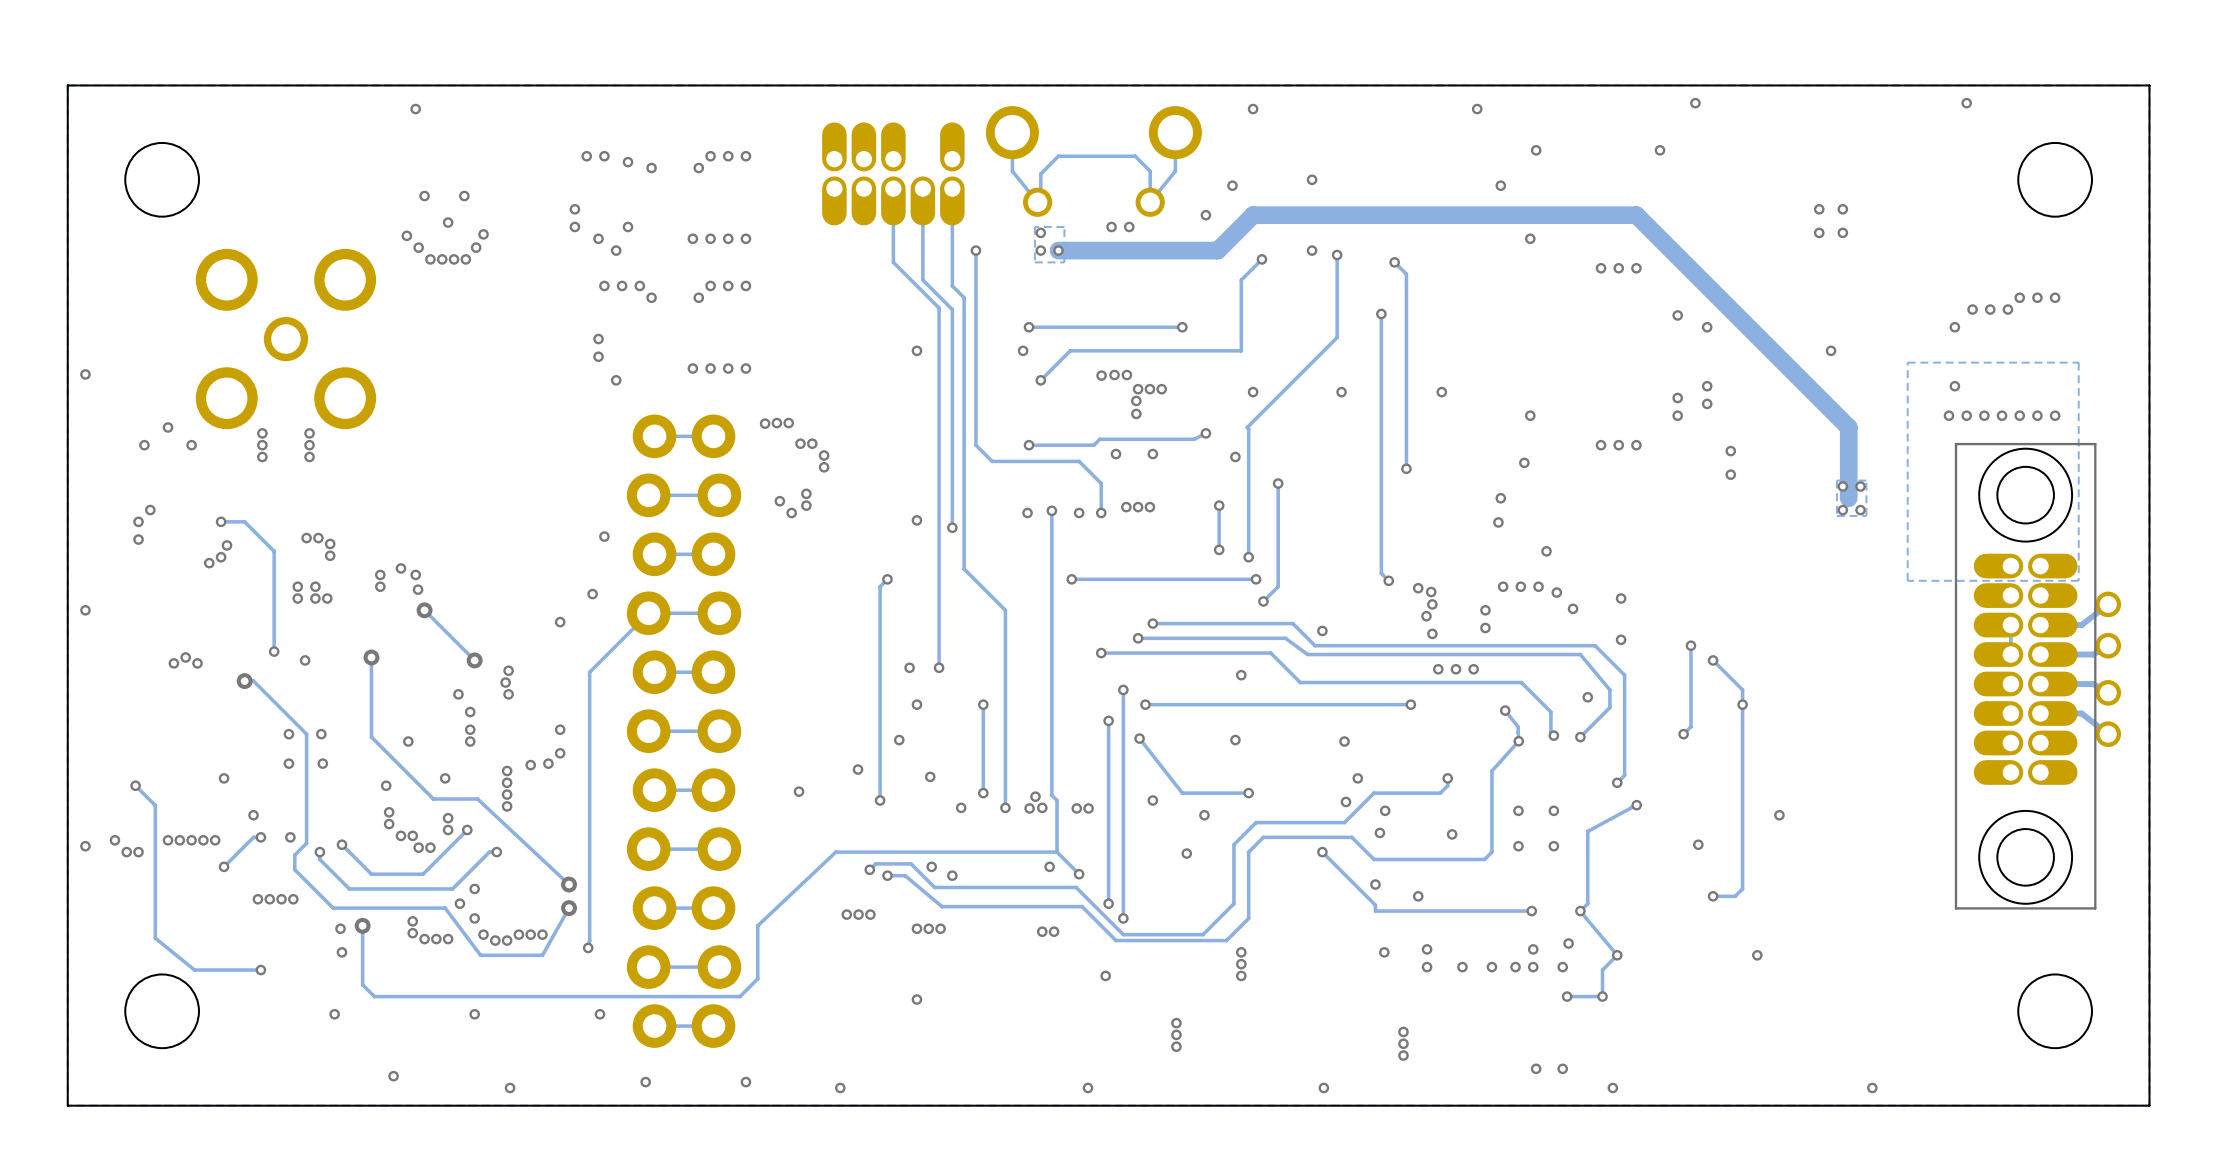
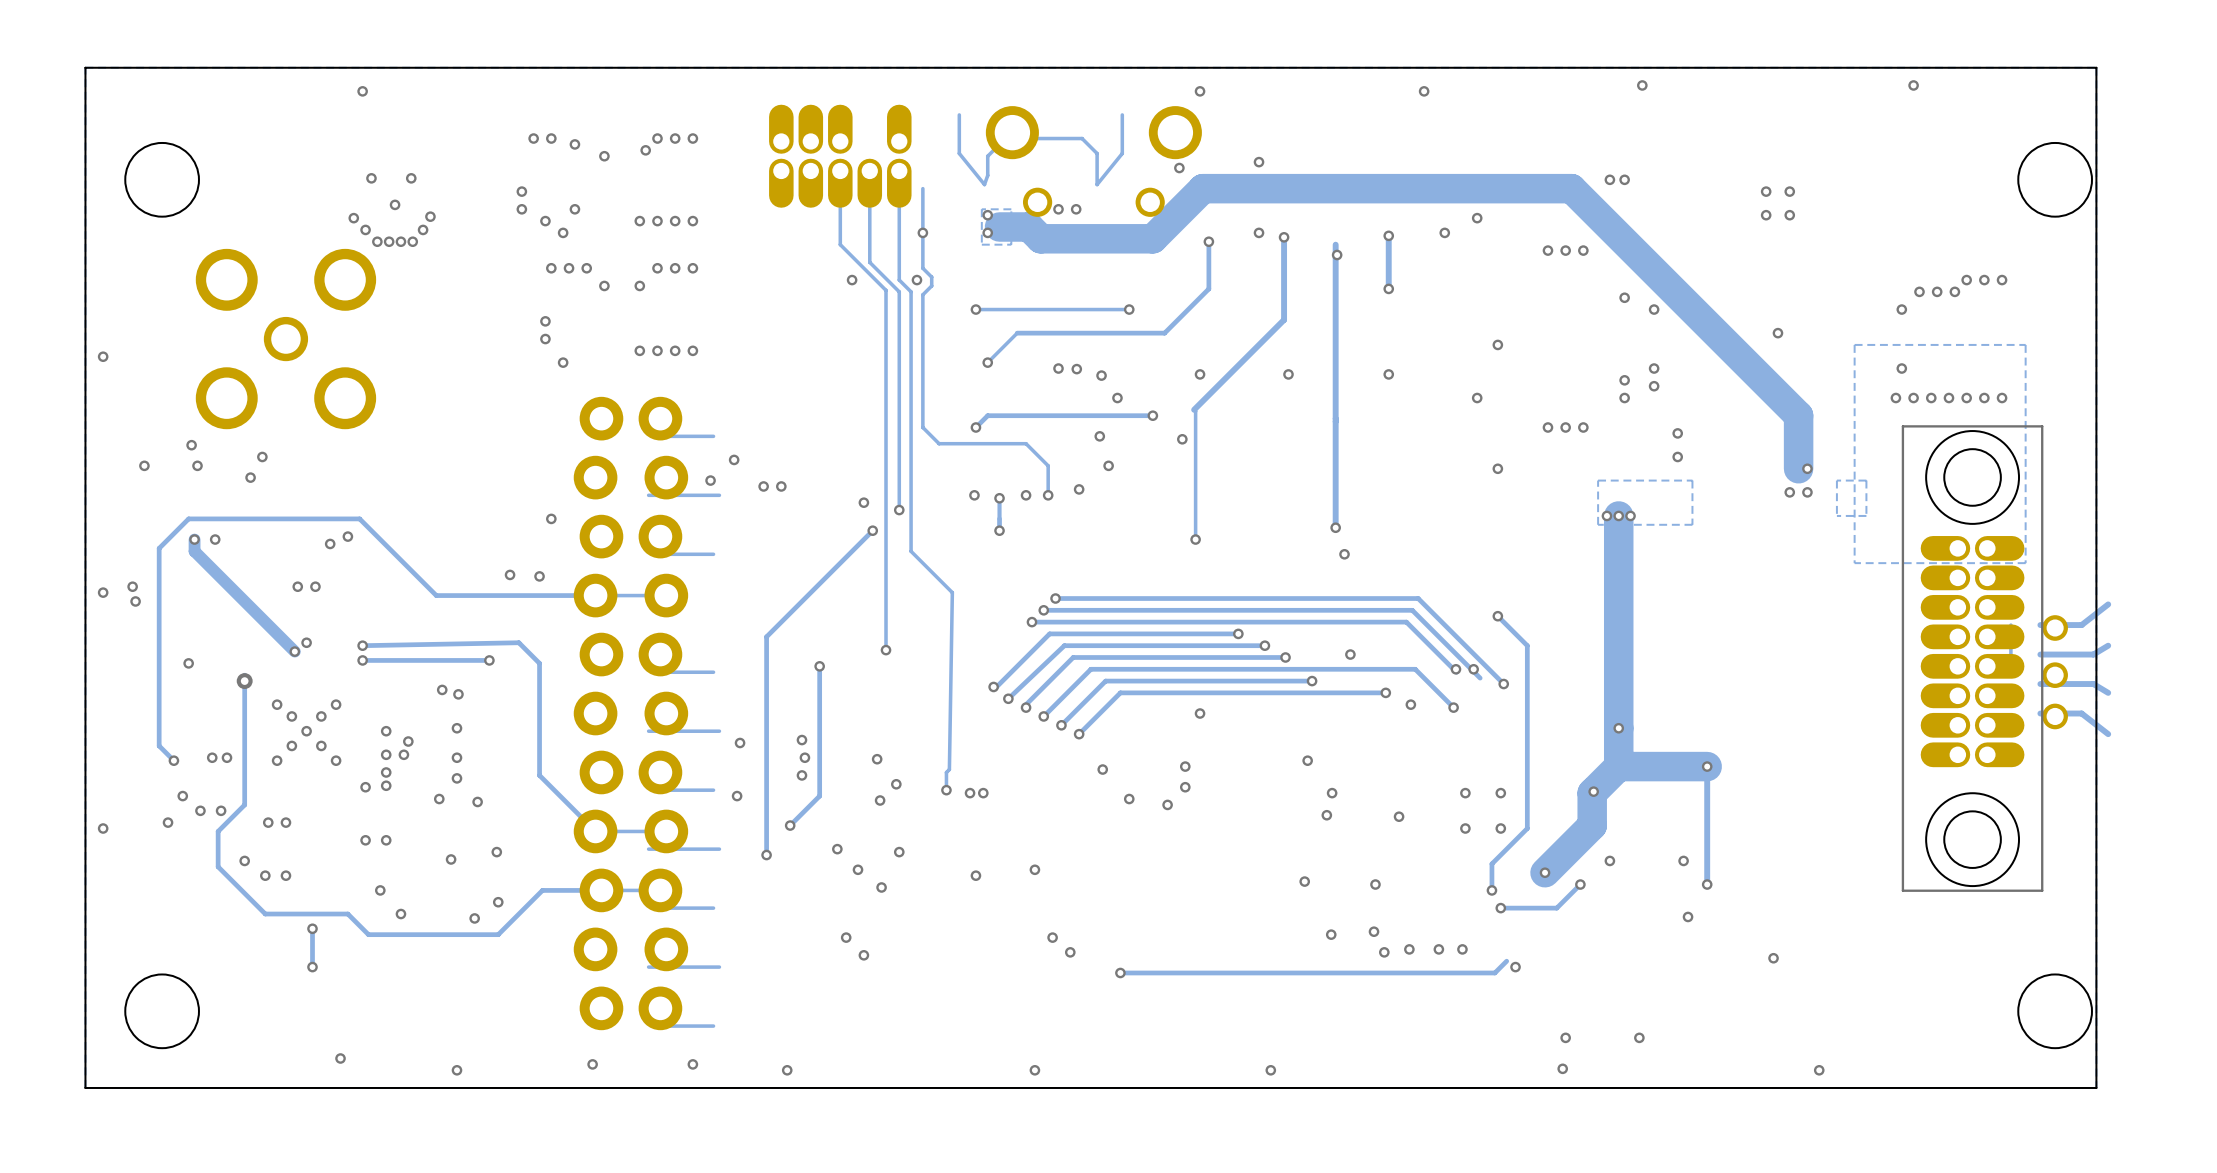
via: none -> (1642, 85)
board edge: (2149, 85) (67, 85) (67, 1105) (2149, 1105) (2149, 85) -> (2096, 67) (2096, 1087) (85, 1087) (85, 67) (2096, 67)
via: none -> (362, 91)
via: none -> (1200, 91)
via: none -> (1424, 91)
via: (1695, 103) -> none
via position: (1966, 103) -> (1913, 85)
via: (415, 109) -> none
via: (1253, 109) -> none
via: (1477, 109) -> none
track: (1175, 132) (1175, 171) (1150, 202) (1150, 171) (1135, 156) (1058, 156) (1040, 173) (1040, 193) (1037, 202) (1012, 171) (1012, 132) -> (1122, 114) (1122, 153) (1097, 184) (1097, 153) (1082, 138) (1005, 138) (987, 156) (987, 175) (984, 184) (959, 153) (959, 114)
via: none -> (533, 138)
via: none -> (551, 138)
via: none -> (657, 138)
via: none -> (675, 138)
via: none -> (692, 138)
via: none -> (645, 150)
via: (1536, 150) -> none
via: (1660, 150) -> none
via position: (586, 156) -> (574, 144)
via: (710, 156) -> none
via: (728, 156) -> none
via: (745, 156) -> none
via: (628, 162) -> none
via: none -> (1259, 162)
via: (651, 168) -> none
via: (698, 168) -> none
via: none -> (1179, 168)
track: none -> (869, 170) (869, 262) (899, 291) (899, 510)
track: none -> (899, 170) (899, 280) (911, 291) (911, 551) (952, 592) (949, 769) (946, 772) (946, 790)
part position: (893, 173) -> (840, 156)
via: none -> (371, 178)
via: none -> (411, 178)
via: (1312, 179) -> none
via: none -> (1609, 179)
via: none -> (1624, 179)
track: (893, 185) (893, 262) (939, 308) (939, 667) -> (840, 168) (840, 244) (886, 290) (886, 650)
via: (1232, 185) -> none
via: (1500, 185) -> none
track: (952, 188) (952, 285) (964, 297) (964, 569) (1005, 610) (1005, 807) -> none
via: none -> (521, 191)
via: none -> (1766, 191)
via: none -> (1789, 191)
via: (424, 196) -> none
via: (464, 196) -> none
via: none -> (395, 204)
via: none -> (521, 209)
via: none -> (1058, 209)
via: none -> (1076, 209)
via: (1819, 209) -> none
via: (1842, 209) -> none
via: none -> (987, 215)
via position: (1205, 215) -> (1208, 241)
via: none -> (1766, 215)
via: none -> (1789, 215)
via: none -> (430, 216)
via: none -> (353, 218)
via: none -> (1477, 218)
via: none -> (545, 221)
via: none -> (657, 221)
via: none -> (675, 221)
via: none -> (692, 221)
via: (448, 222) -> none
via position: (574, 226) -> (563, 232)
via position: (628, 226) -> (639, 221)
track: none -> (999, 226) (1029, 226) (1040, 238) (1152, 238) (1202, 188) (1571, 188) (1798, 415) (1798, 468)
zone outline: (1064, 226) (1034, 226) (1034, 262) (1064, 262) (1064, 226) -> (1011, 209) (981, 209) (981, 244) (1011, 244) (1011, 209)
via: (1111, 226) -> none
via: (1129, 226) -> none
via: none -> (365, 229)
via: none -> (423, 229)
via: none -> (922, 232)
via: none -> (987, 232)
via: (1040, 232) -> none
via: none -> (1259, 232)
via: none -> (1444, 232)
via: (1819, 232) -> none
via: (1842, 232) -> none
via: (483, 234) -> none
via: (406, 235) -> none
track: none -> (1388, 235) (1388, 288)
via: none -> (1388, 235)
via: none -> (1284, 237)
via: (598, 238) -> none
via: (692, 238) -> none
via: (710, 238) -> none
via: (728, 238) -> none
via: (745, 238) -> none
via: (1530, 238) -> none
via: none -> (377, 241)
via: none -> (389, 241)
via: none -> (400, 241)
via: none -> (412, 241)
track: none -> (1208, 241) (1208, 288) (1164, 333) (1017, 333) (987, 362)
track: none -> (1335, 244) (1335, 527)
via: (418, 247) -> none
via: (476, 247) -> none
via: (616, 250) -> none
track: (975, 250) (975, 445) (992, 461) (1079, 461) (1101, 483) (1101, 513) -> none
via: (975, 250) -> none
via: (1040, 250) -> none
track: (1058, 250) (1217, 250) (1253, 215) (1636, 215) (1848, 427) (1848, 498) (1848, 492) (1842, 486) -> none
via: (1058, 250) -> none
via: (1312, 250) -> none
via: none -> (1547, 250)
via: none -> (1565, 250)
via: none -> (1583, 250)
track: (1337, 255) (1337, 337) (1247, 427) (1248, 557) -> (1284, 237) (1284, 319) (1194, 409) (1195, 539)
via: (430, 259) -> none
via: (442, 259) -> none
via: (454, 259) -> none
via: (465, 259) -> none
track: (1261, 259) (1241, 280) (1241, 350) (1070, 350) (1040, 380) -> none
via: (1261, 259) -> none
track: (1394, 262) (1406, 274) (1406, 468) -> none
via: (1394, 262) -> none
via: none -> (551, 268)
via: none -> (569, 268)
via: none -> (586, 268)
via: none -> (657, 268)
via: none -> (675, 268)
via: none -> (692, 268)
track: (922, 268) (922, 280) (952, 309) (952, 527) -> (922, 268) (931, 277) (931, 285) (922, 294) (922, 427) (939, 443) (1026, 443) (1048, 465) (1048, 495)
via: (1601, 268) -> none
via: (1618, 268) -> none
via: (1636, 268) -> none
via: none -> (852, 280)
via: none -> (916, 280)
via: none -> (1966, 280)
via: none -> (1984, 280)
via: none -> (2002, 280)
via: (622, 285) -> none
via: (710, 285) -> none
via: (728, 285) -> none
via: (745, 285) -> none
via: none -> (1388, 288)
via: none -> (1919, 291)
via: none -> (1937, 291)
via: none -> (1954, 291)
via: (651, 297) -> none
via: (698, 297) -> none
via: none -> (1624, 297)
via: (2019, 297) -> none
via: (2037, 297) -> none
via: (2055, 297) -> none
via: none -> (975, 309)
via: none -> (1129, 309)
via: none -> (1654, 309)
via: none -> (1901, 309)
via: (1972, 309) -> none
via: (1990, 309) -> none
via: (2007, 309) -> none
track: (1381, 313) (1381, 573) (1388, 580) -> none
via: (1381, 313) -> none
via: (1677, 315) -> none
via: none -> (545, 321)
via: (1029, 327) -> none
track: (1182, 327) (1029, 327) -> (1129, 309) (975, 309)
via: (1182, 327) -> none
via: (1707, 327) -> none
via: (1954, 327) -> none
via: none -> (1777, 333)
via: none -> (545, 339)
via: (598, 339) -> none
via: none -> (1497, 344)
via: none -> (639, 350)
via: none -> (657, 350)
via: none -> (675, 350)
via: none -> (692, 350)
via: (916, 350) -> none
via: (1023, 350) -> none
via: (1831, 350) -> none
via: (598, 356) -> none
via: none -> (563, 362)
via: none -> (987, 362)
zone outline: (2078, 362) (1907, 362) (1907, 580) (2078, 580) (2078, 362) -> (2025, 344) (1854, 344) (1854, 563) (2025, 563) (2025, 344)
via: (692, 368) -> none
via: (710, 368) -> none
via: (728, 368) -> none
via: (745, 368) -> none
via: none -> (1058, 368)
via: none -> (1654, 368)
via: none -> (1901, 368)
via: none -> (1076, 369)
via position: (85, 374) -> (103, 356)
via: none -> (1200, 374)
via: none -> (1288, 374)
via: none -> (1388, 374)
via: (1114, 375) -> none
via: (1126, 375) -> none
via: (616, 380) -> none
via: (1040, 380) -> none
via: none -> (1624, 380)
via: none -> (1654, 386)
via: (1707, 386) -> none
via: (1954, 386) -> none
via: (1138, 389) -> none
via: (1149, 389) -> none
via: (1161, 389) -> none
via: (1253, 392) -> none
via: (1341, 392) -> none
via: (1441, 392) -> none
via: none -> (1117, 398)
via: none -> (1477, 398)
via: none -> (1624, 398)
via: (1677, 398) -> none
via: none -> (1895, 398)
via: none -> (1913, 398)
via: none -> (1931, 398)
via: none -> (1948, 398)
via: none -> (1966, 398)
via: none -> (1984, 398)
via: none -> (2002, 398)
via: (1136, 400) -> none
via: (1707, 403) -> none
via: (1136, 413) -> none
track: none -> (1152, 415) (987, 415) (975, 427)
via: none -> (1152, 415)
via: (1530, 415) -> none
via: (1677, 415) -> none
via: (1948, 415) -> none
via: (1966, 415) -> none
via: (1984, 415) -> none
via: (2002, 415) -> none
via: (2019, 415) -> none
via: (2037, 415) -> none
via: (2055, 415) -> none
via: (765, 423) -> none
via: (776, 423) -> none
via: (788, 423) -> none
via: (168, 427) -> none
via: none -> (975, 427)
via: none -> (1547, 427)
via: none -> (1565, 427)
via: none -> (1583, 427)
via: (262, 433) -> none
via: (309, 433) -> none
track: (1205, 433) (1194, 439) (1099, 439) (1093, 445) (1029, 445) -> none
via: (1205, 433) -> none
via: none -> (1677, 433)
via: none -> (1099, 436)
via: none -> (1182, 439)
via: (800, 443) -> none
via: (812, 443) -> none
via position: (144, 445) -> (144, 465)
via: (262, 445) -> none
via: (309, 445) -> none
via: (1029, 445) -> none
via: (1601, 445) -> none
via: (1618, 445) -> none
via: (1636, 445) -> none
via: (1730, 451) -> none
via: (1115, 454) -> none
via: (1152, 454) -> none
via: (824, 455) -> none
via: (309, 456) -> none
via: (1235, 456) -> none
via: none -> (1677, 456)
via: none -> (734, 459)
via: (1524, 462) -> none
via: none -> (197, 465)
via: none -> (1108, 465)
via: (824, 467) -> none
via: (1406, 468) -> none
via: none -> (1497, 468)
via: none -> (1807, 468)
via: (1730, 474) -> none
via: none -> (250, 477)
via: none -> (710, 480)
zone outline: none -> (1692, 480) (1598, 480) (1598, 524) (1692, 524) (1692, 480)
track: (1278, 483) (1278, 586) (1263, 601) -> none
via: (1278, 483) -> none
via: none -> (763, 486)
via: none -> (781, 486)
via: (1842, 486) -> none
via: (1860, 486) -> none
via: none -> (1079, 489)
via: none -> (1789, 492)
via: none -> (1807, 492)
via: (806, 493) -> none
via: none -> (974, 495)
via: none -> (1026, 495)
via: none -> (1048, 495)
track: none -> (999, 498) (999, 530)
via: none -> (999, 498)
via: (1500, 498) -> none
via: (779, 501) -> none
via: none -> (863, 502)
via: (806, 505) -> none
track: (1219, 505) (1219, 549) -> none
via: (1219, 505) -> none
via: (1126, 507) -> none
via: (1138, 507) -> none
via: (1149, 507) -> none
via: (150, 510) -> none
track: (1051, 510) (1051, 795) (1057, 800) (1057, 852) -> none
via: (1051, 510) -> none
via: (1842, 510) -> none
via: (1860, 510) -> none
via: (791, 513) -> none
via: (1027, 513) -> none
via: (1079, 513) -> none
via: (1101, 513) -> none
via: none -> (1606, 515)
track: none -> (1618, 515) (1618, 766)
via: none -> (1618, 515)
via: none -> (1630, 515)
via: none -> (551, 518)
via position: (916, 520) -> (899, 510)
via: (138, 521) -> none
track: (221, 521) (244, 521) (274, 551) (274, 651) -> none
via: (221, 521) -> none
via: (1498, 522) -> none
via: (952, 527) -> none
via: none -> (1335, 527)
track: none -> (872, 530) (766, 636) (766, 855)
via: none -> (872, 530)
via: none -> (999, 530)
via: none -> (347, 536)
via: (604, 536) -> none
via: (306, 538) -> none
via: (318, 538) -> none
via: (138, 539) -> none
track: none -> (194, 539) (194, 551) (294, 651)
via: none -> (194, 539)
via: none -> (215, 539)
via: none -> (1195, 539)
via: (226, 545) -> none
via: (1219, 549) -> none
via: (1546, 551) -> none
via: none -> (1344, 554)
via: (330, 555) -> none
via: (221, 557) -> none
via: (1248, 557) -> none
via: (209, 563) -> none
via: (400, 568) -> none
via: (380, 574) -> none
via: (415, 574) -> none
via: none -> (510, 574)
via: none -> (539, 576)
track: (887, 579) (880, 586) (880, 800) -> none
via: (887, 579) -> none
via: (1071, 579) -> none
track: (1256, 579) (1071, 579) -> none
via: (1256, 579) -> none
via: (1388, 580) -> none
via: none -> (132, 586)
via: (380, 586) -> none
via: (1503, 586) -> none
via: (1520, 586) -> none
via: (1538, 586) -> none
via: (1418, 588) -> none
via: (418, 589) -> none
via: (1431, 592) -> none
via: (1556, 592) -> none
via: (592, 594) -> none
track: none -> (666, 595) (436, 595) (359, 518) (188, 518) (159, 548) (159, 745) (173, 760)
via: (297, 598) -> none
via: (315, 598) -> none
via: (327, 598) -> none
track: none -> (1055, 598) (1418, 598) (1503, 684)
via: none -> (1055, 598)
via: (1621, 598) -> none
via: none -> (135, 601)
via: (1263, 601) -> none
via: (1432, 604) -> none
part: (2108, 604) -> none
via: (1573, 608) -> none
via position: (85, 610) -> (103, 592)
track: (424, 610) (474, 660) -> none
via: (424, 610) -> none
track: none -> (1043, 610) (1412, 610) (1480, 678)
via: none -> (1043, 610)
via: (1485, 610) -> none
track: (719, 613) (648, 613) (589, 672) (588, 947) -> none
via: (1426, 616) -> none
track: none -> (1497, 616) (1527, 645) (1527, 828) (1491, 863) (1491, 890)
via: none -> (1497, 616)
via: (560, 622) -> none
track: none -> (1031, 622) (1406, 622) (1456, 672)
via: none -> (1031, 622)
track: (1152, 623) (1292, 623) (1315, 645) (1595, 645) (1624, 675) (1624, 775) (1617, 782) -> none
via: (1152, 623) -> none
via: (1485, 628) -> none
part: none -> (2055, 628)
via: (1322, 630) -> none
track: none -> (1238, 633) (1049, 633) (996, 686) (993, 686)
via: none -> (1238, 633)
via: (1432, 633) -> none
track: (1138, 638) (1285, 638) (1307, 654) (1580, 654) (1609, 689) (1609, 707) (1580, 737) -> none
via: (1138, 638) -> none
via: (1621, 639) -> none
via: none -> (306, 642)
track: none -> (362, 645) (518, 642) (539, 663) (539, 775) (595, 831) (666, 831)
via: none -> (362, 645)
track: none -> (1264, 645) (1064, 645) (1008, 698)
via: none -> (1264, 645)
track: (1690, 645) (1690, 726) (1683, 734) -> none
via: (1690, 645) -> none
part: (2108, 645) -> none
via: none -> (886, 650)
via: (274, 651) -> none
track: (1101, 653) (1270, 653) (1300, 682) (1521, 682) (1550, 712) (1550, 732) (1553, 735) -> none
via: (1101, 653) -> none
via: none -> (1350, 654)
via: (185, 657) -> none
track: (371, 657) (371, 737) (433, 799) (477, 799) (569, 884) -> none
via: (371, 657) -> none
track: none -> (1285, 657) (1073, 657) (1026, 704) (1026, 707)
via: none -> (1285, 657)
via position: (305, 660) -> (294, 651)
via: none -> (362, 660)
via: (474, 660) -> none
track: none -> (489, 660) (362, 660)
via: none -> (489, 660)
track: (1713, 660) (1742, 689) (1742, 888) (1735, 896) (1713, 896) -> none
via: (1713, 660) -> none
via: (173, 663) -> none
via: none -> (188, 663)
via: (197, 663) -> none
track: none -> (819, 666) (819, 796) (790, 825)
via: none -> (819, 666)
via: (909, 667) -> none
via: (939, 667) -> none
via: (1438, 669) -> none
via: (508, 670) -> none
track: none -> (244, 675) (244, 804) (218, 831) (218, 866) (265, 914) (347, 914) (368, 934) (498, 934) (542, 890) (660, 890)
via: (1241, 675) -> none
part: none -> (2055, 675)
part position: (2025, 676) -> (1972, 658)
track: (244, 681) (253, 681) (306, 734) (306, 843) (294, 855) (294, 869) (333, 908) (445, 908) (480, 955) (542, 955) (569, 908) -> none
track: none -> (1312, 681) (1105, 681) (1061, 725)
via: none -> (1312, 681)
via: (505, 682) -> none
via: none -> (1503, 684)
via: none -> (993, 686)
via: none -> (442, 689)
track: (1123, 689) (1123, 918) -> none
via: (1123, 689) -> none
track: none -> (1385, 692) (1120, 692) (1079, 734)
via: none -> (1385, 692)
part: (2108, 692) -> none
via: (508, 694) -> none
via: (1587, 697) -> none
via: none -> (1008, 698)
via: none -> (277, 704)
via: none -> (336, 704)
via: (916, 704) -> none
track: (983, 704) (983, 793) -> none
via: (983, 704) -> none
via: (1145, 704) -> none
track: (1410, 704) (1145, 704) -> none
via: (1742, 704) -> none
via: none -> (1026, 707)
track: none -> (1453, 707) (1415, 669) (1090, 669) (1043, 716)
via: none -> (1453, 707)
track: (1505, 710) (1518, 727) (1518, 741) -> none
via: (1505, 710) -> none
via: (470, 712) -> none
via: none -> (1200, 713)
via: none -> (291, 716)
via: none -> (321, 716)
via: none -> (1043, 716)
part: none -> (2055, 716)
track: (1108, 720) (1108, 903) -> none
via: (1108, 720) -> none
via: none -> (1061, 725)
via: none -> (456, 728)
via: none -> (1618, 728)
via: (470, 729) -> none
via: (560, 729) -> none
via: none -> (306, 731)
via: none -> (386, 731)
part position: (684, 731) -> (630, 713)
via: (288, 734) -> none
via: (321, 734) -> none
via: none -> (1079, 734)
via: (1683, 734) -> none
part: (2108, 734) -> none
via: (1553, 735) -> none
via: (1580, 737) -> none
track: (1139, 738) (1182, 793) (1248, 793) -> none
via: (1139, 738) -> none
via: none -> (801, 740)
via: (899, 740) -> none
via: (1235, 740) -> none
via: (470, 741) -> none
via: (1344, 741) -> none
track: (1518, 741) (1491, 771) (1491, 852) (1484, 859) (1374, 859) (1351, 837) (1263, 837) (1248, 852) (1248, 918) (1226, 940) (1115, 940) (1082, 906) (942, 906) (905, 875) (887, 875) -> none
via: (1518, 741) -> none
via: none -> (740, 743)
via: none -> (291, 745)
via: none -> (321, 745)
via: (560, 753) -> none
via: none -> (386, 754)
via: none -> (403, 754)
via: none -> (212, 757)
via: none -> (226, 757)
via: none -> (456, 757)
via: none -> (804, 757)
via: none -> (877, 759)
via: none -> (173, 760)
via: none -> (277, 760)
via: none -> (336, 760)
via: none -> (1307, 760)
via: (288, 763) -> none
via: (322, 763) -> none
via: (548, 763) -> none
via: (530, 765) -> none
via: none -> (1185, 766)
track: none -> (1618, 766) (1592, 793) (1592, 825) (1545, 872) (1547, 875) (1556, 866)
track: none -> (1618, 766) (1707, 766) (1707, 884)
via: none -> (1707, 766)
via: (857, 769) -> none
via: none -> (1102, 769)
via: (507, 771) -> none
via: none -> (386, 772)
via: (930, 776) -> none
via: (224, 778) -> none
via: (445, 778) -> none
via: none -> (456, 778)
via: (1357, 778) -> none
track: (1447, 778) (1447, 785) (1440, 793) (1374, 793) (1344, 822) (1256, 822) (1233, 844) (1233, 903) (1202, 934) (1123, 934) (1076, 887) (934, 887) (911, 863) (875, 863) (869, 869) -> none
via: (1447, 778) -> none
via: (507, 782) -> none
via: (1617, 782) -> none
via: none -> (896, 784)
track: (135, 785) (155, 805) (155, 938) (194, 970) (260, 970) -> none
via: (135, 785) -> none
via: none -> (365, 787)
via: none -> (1185, 787)
via: none -> (946, 790)
via position: (799, 791) -> (801, 775)
via: none -> (1593, 791)
via: none -> (970, 793)
via: (1248, 793) -> none
via: none -> (1332, 793)
via: none -> (1465, 793)
via: none -> (1500, 793)
via: (507, 794) -> none
via: none -> (182, 796)
via: none -> (737, 796)
via: (1035, 796) -> none
via: none -> (439, 799)
via: none -> (1129, 799)
via: (1152, 800) -> none
via: none -> (477, 801)
via: (1345, 801) -> none
via: none -> (1167, 804)
track: (1636, 805) (1587, 831) (1587, 903) (1580, 911) (1617, 955) (1602, 970) (1602, 996) (1567, 996) -> none
via: (1636, 805) -> none
via: (507, 806) -> none
via: (961, 807) -> none
via: (1005, 807) -> none
via: (1042, 807) -> none
via: (1029, 808) -> none
via: (1076, 808) -> none
via: (1088, 808) -> none
via: none -> (200, 810)
via: none -> (221, 810)
via: (1385, 810) -> none
via: (1518, 810) -> none
via: (1553, 810) -> none
via: (389, 812) -> none
via: (253, 815) -> none
via: (1204, 815) -> none
via: none -> (1326, 815)
via: (1779, 815) -> none
via: none -> (1399, 816)
via: (448, 818) -> none
via: none -> (168, 822)
via: none -> (268, 822)
via: none -> (285, 822)
via: (389, 824) -> none
via: none -> (790, 825)
via: none -> (103, 828)
via: none -> (1500, 828)
via: (448, 829) -> none
track: (467, 829) (423, 874) (371, 874) (341, 844) -> none
via: (467, 829) -> none
via: (1379, 832) -> none
via position: (1452, 834) -> (1465, 828)
via: (400, 835) -> none
via: (412, 835) -> none
track: (260, 837) (253, 837) (224, 866) -> none
via: (260, 837) -> none
via: (290, 837) -> none
via: (114, 840) -> none
via: (168, 840) -> none
via: (179, 840) -> none
via: (191, 840) -> none
via: (203, 840) -> none
via: (215, 840) -> none
via: none -> (365, 840)
via: none -> (386, 840)
via: (341, 844) -> none
via: (1698, 844) -> none
via: (85, 846) -> none
via: (1518, 846) -> none
via: (1553, 846) -> none
via: (418, 847) -> none
via: (430, 847) -> none
via: none -> (837, 849)
via: (126, 852) -> none
via: (138, 852) -> none
via: (319, 852) -> none
track: (496, 852) (489, 852) (452, 888) (349, 888) (319, 859) (319, 852) -> none
via: none -> (899, 852)
track: (1057, 852) (1079, 874) -> none
track: (1057, 852) (835, 852) (757, 925) (757, 978) (740, 996) (374, 996) (362, 984) (362, 925) -> none
track: (1322, 852) (1375, 905) (1375, 911) (1531, 911) -> none
via: (1322, 852) -> none
via: (1186, 853) -> none
via: none -> (766, 855)
via: none -> (451, 859)
via: none -> (244, 860)
via: none -> (1609, 860)
via: none -> (1683, 860)
via: (224, 866) -> none
via: (931, 866) -> none
via position: (1049, 866) -> (1034, 869)
via: none -> (857, 869)
via: (869, 869) -> none
via: none -> (1545, 872)
via: (1079, 874) -> none
via: none -> (265, 875)
via: none -> (285, 875)
via: (887, 875) -> none
via: (952, 875) -> none
via: none -> (975, 875)
via: none -> (1304, 881)
via: (569, 884) -> none
track: none -> (1580, 884) (1556, 908) (1500, 908)
via: none -> (1580, 884)
via: none -> (881, 887)
via: (474, 888) -> none
via: none -> (380, 890)
via: none -> (1491, 890)
via: (1418, 896) -> none
via position: (1713, 896) -> (1707, 884)
via: (257, 899) -> none
via: (269, 899) -> none
via: (281, 899) -> none
via: (293, 899) -> none
via: none -> (498, 902)
via: (459, 903) -> none
via: (1108, 903) -> none
via: (569, 908) -> none
via: none -> (1500, 908)
via: (1531, 911) -> none
via: (1580, 911) -> none
via: none -> (400, 914)
via: (846, 914) -> none
via: (858, 914) -> none
via: (870, 914) -> none
via: none -> (1688, 916)
via: (1123, 918) -> none
via: (412, 921) -> none
via: (362, 925) -> none
track: none -> (312, 928) (312, 967)
via: none -> (312, 928)
via: (340, 928) -> none
via: (916, 928) -> none
via: (928, 928) -> none
via: (940, 928) -> none
via: (1042, 931) -> none
via: (1054, 931) -> none
via: none -> (1374, 931)
via: (412, 933) -> none
via: (483, 934) -> none
via: (518, 934) -> none
via: (530, 934) -> none
via: (542, 934) -> none
via: none -> (1331, 934)
via: none -> (846, 937)
via: none -> (1052, 937)
via: (424, 939) -> none
via: (436, 939) -> none
via: (448, 939) -> none
via: (495, 940) -> none
via: (507, 940) -> none
via: (1568, 943) -> none
via: (588, 947) -> none
via: none -> (1409, 949)
via: (1427, 949) -> none
via: none -> (1438, 949)
via: none -> (1462, 949)
via: (1533, 949) -> none
via: (341, 952) -> none
via: none -> (1070, 952)
via: (1241, 952) -> none
via: none -> (863, 955)
via: (1617, 955) -> none
via position: (1757, 955) -> (1773, 958)
track: none -> (1506, 961) (1494, 972) (1120, 972)
via: (1241, 964) -> none
via: none -> (312, 967)
via: (1427, 967) -> none
via: (1462, 967) -> none
via: (1491, 967) -> none
via: (1533, 967) -> none
via: (1562, 967) -> none
via: (260, 970) -> none
via position: (1105, 975) -> (1120, 972)
via: (1241, 975) -> none
via: (1567, 996) -> none
via: (1602, 996) -> none
via: (916, 999) -> none
via: (334, 1014) -> none
via: (474, 1014) -> none
via: (599, 1014) -> none
via: (1176, 1023) -> none
via: (1403, 1031) -> none
via: (1176, 1034) -> none
via: none -> (1565, 1037)
via: none -> (1639, 1037)
via: (1403, 1043) -> none
via: (1176, 1046) -> none
via: (1403, 1055) -> none
via: none -> (340, 1058)
via: none -> (592, 1064)
via: none -> (692, 1064)
via: (1536, 1068) -> none
via: none -> (456, 1070)
via: none -> (787, 1070)
via: none -> (1270, 1070)
via: (393, 1076) -> none
via: (645, 1082) -> none
via: (745, 1082) -> none
via: (510, 1087) -> none
via: (840, 1087) -> none
via position: (1087, 1087) -> (1034, 1070)
via: (1323, 1087) -> none
via: (1612, 1087) -> none
via position: (1872, 1087) -> (1819, 1070)

